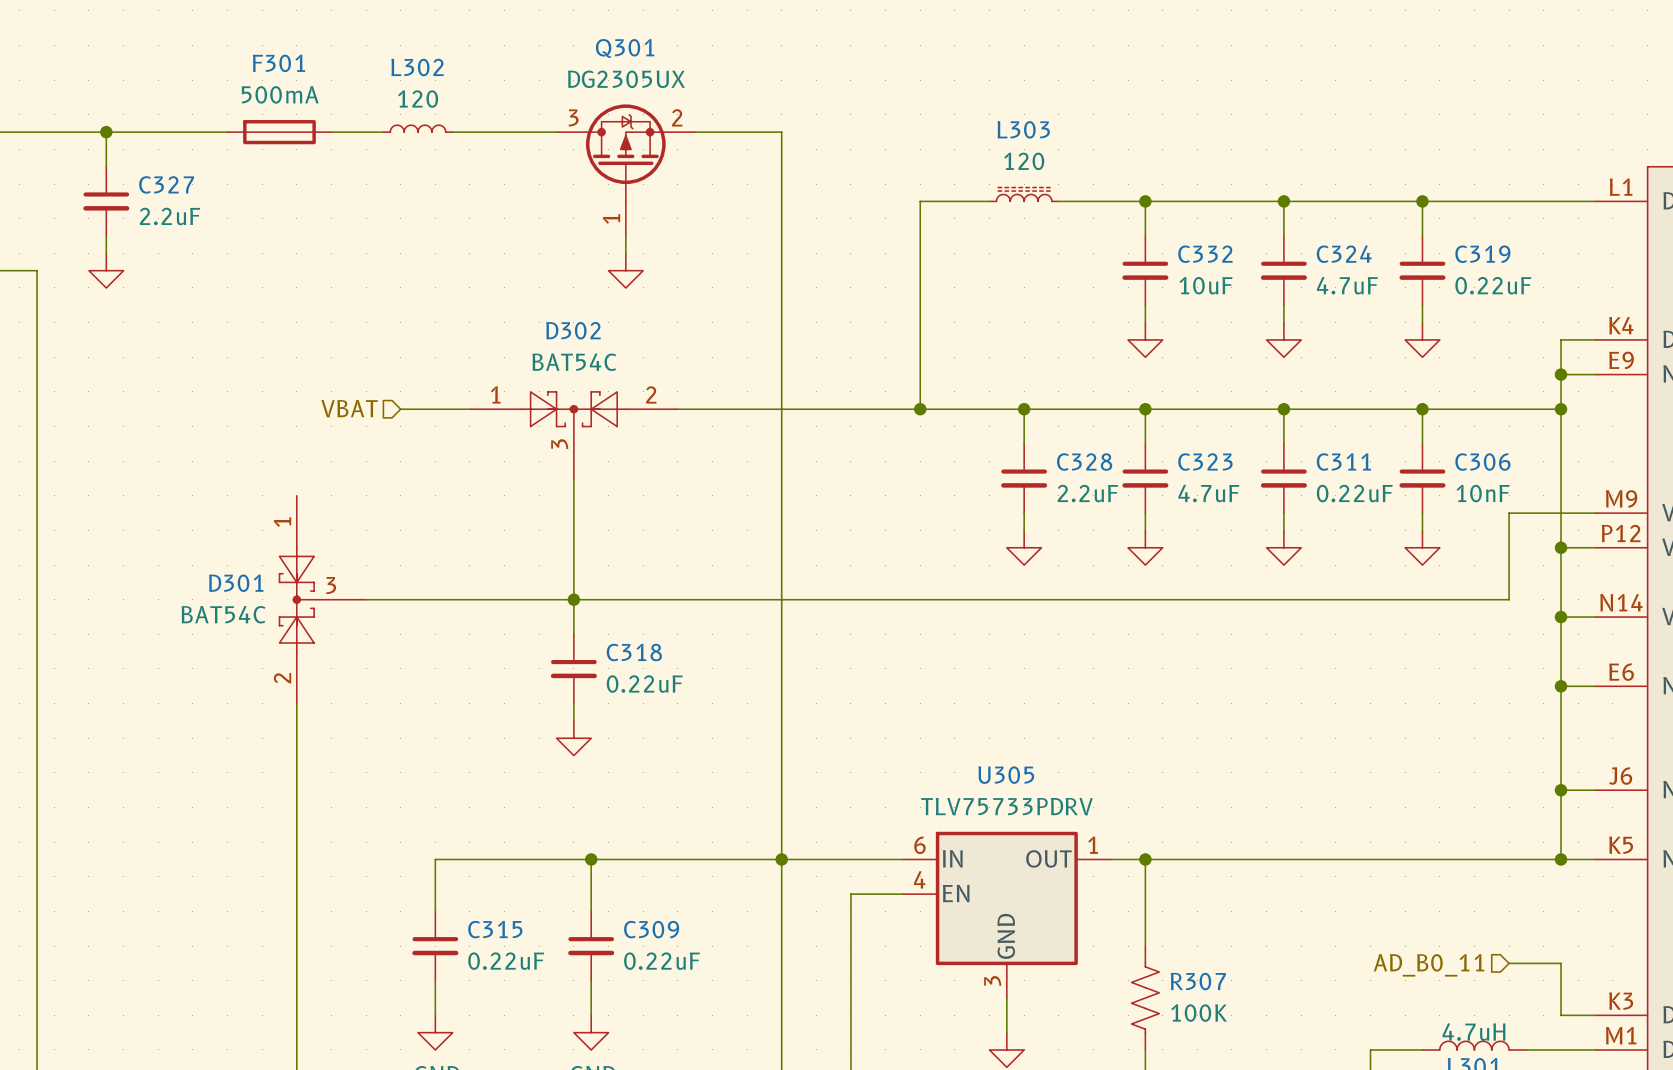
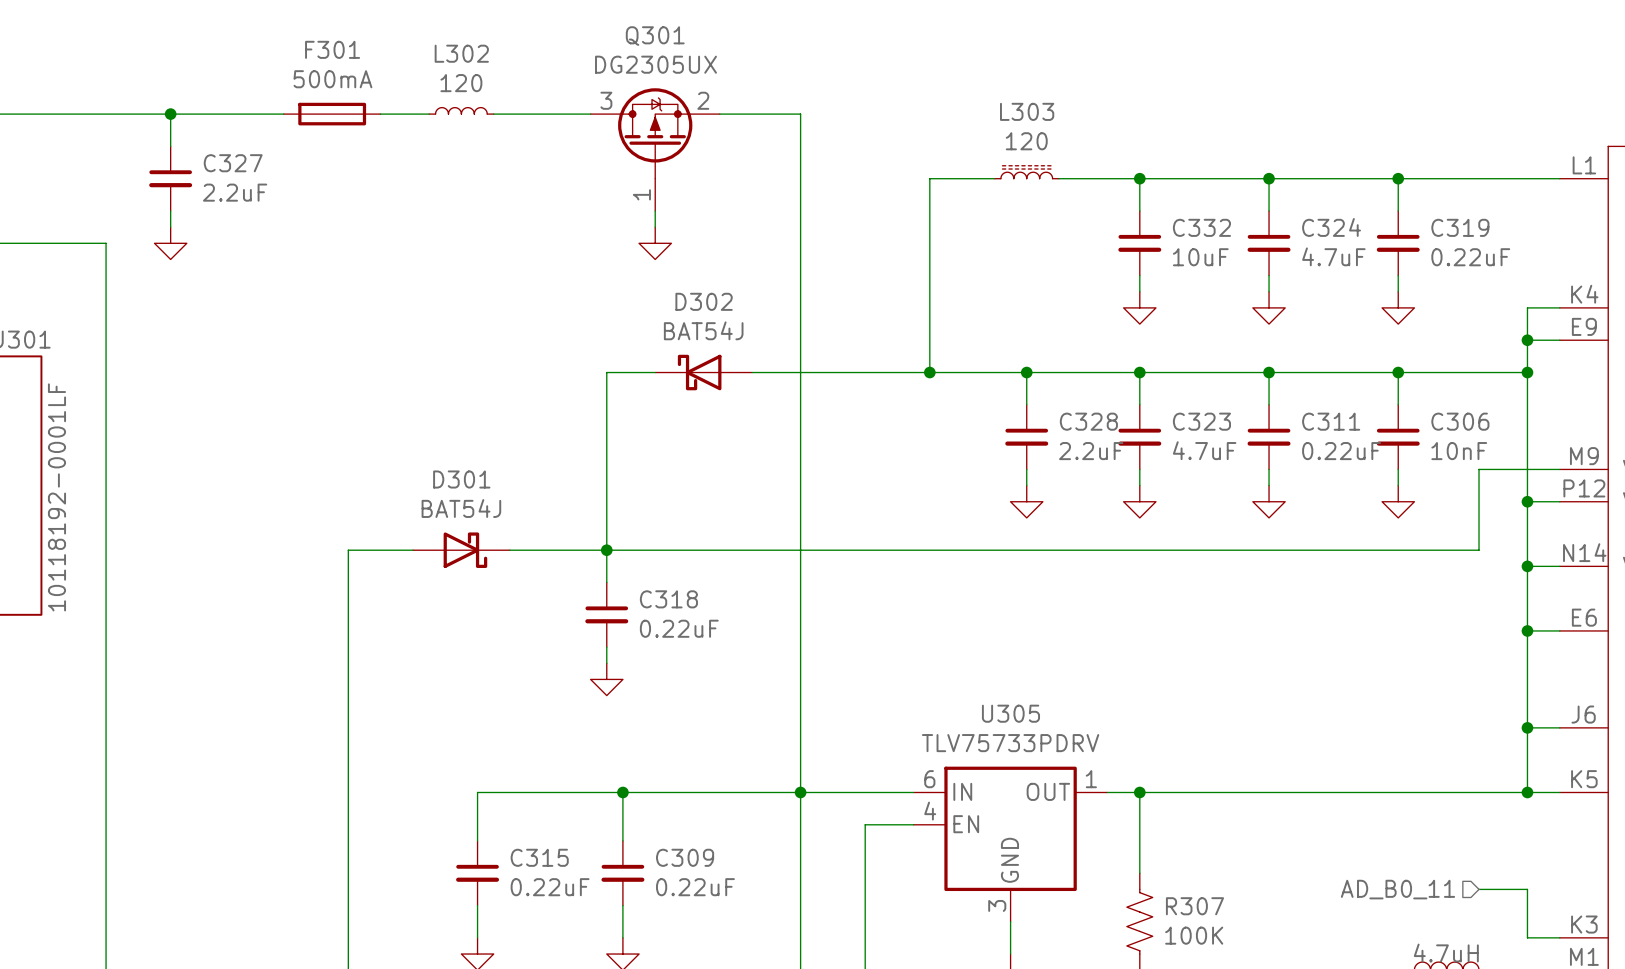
D302 name position: D302 (573, 330) -> D302 (704, 301)
D302 value: BAT54C (574, 362) -> BAT54J (703, 330)
D302 symbol: [469, 391, 678, 479] -> [655, 354, 753, 391]
hierarchical label: VBAT (349, 408) -> none
wire: (400, 409) (469, 409) -> none
D301 symbol: [279, 495, 367, 704] -> [412, 532, 510, 568]
D301 name position: D301 (236, 583) -> D301 (461, 479)
D301 value: BAT54C (223, 614) -> BAT54J (461, 508)

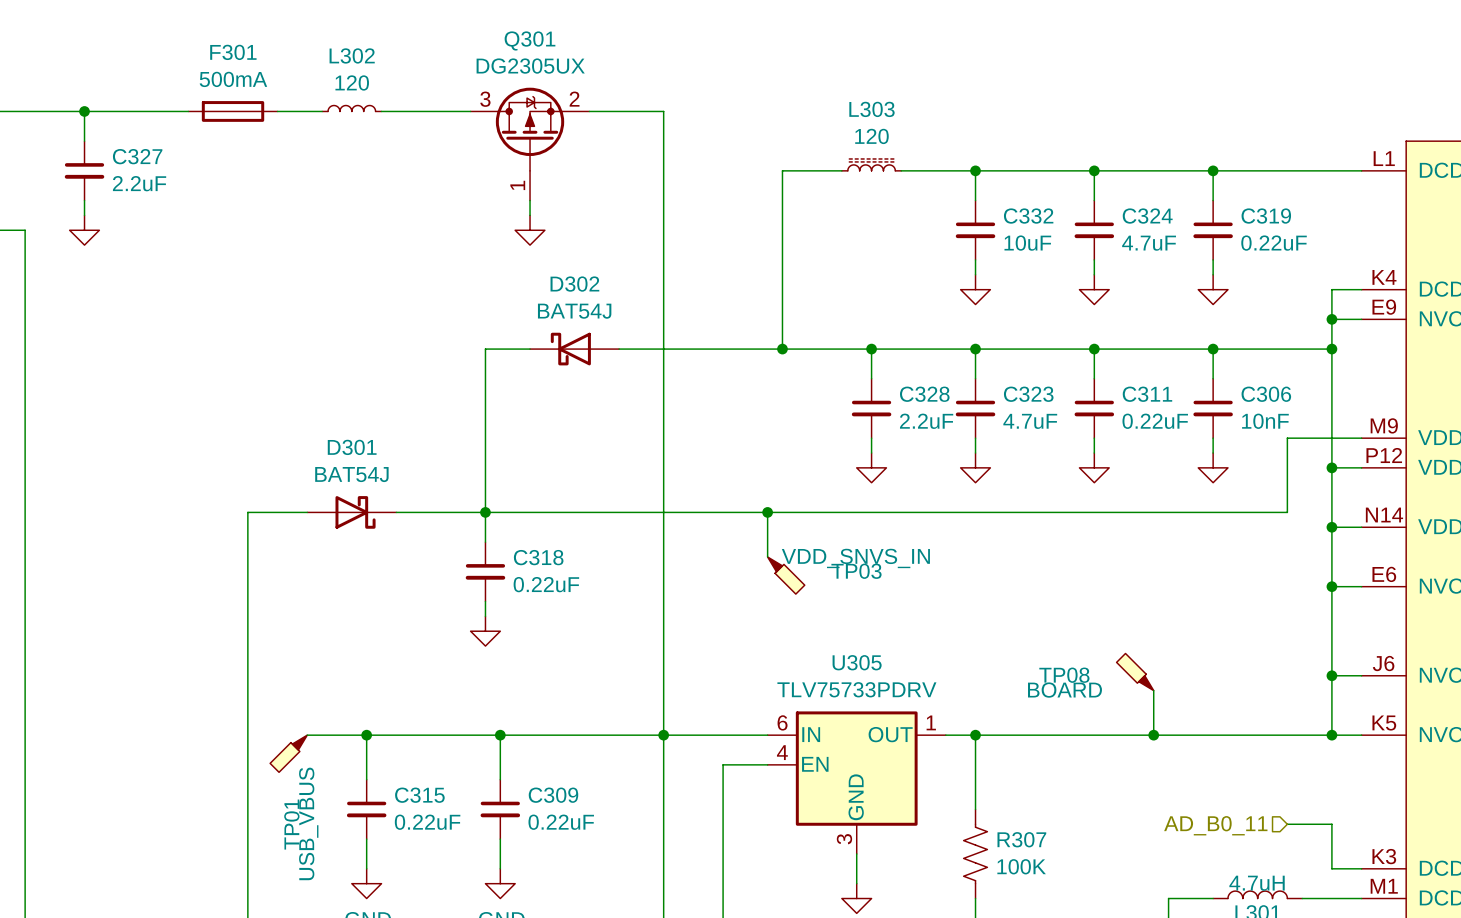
wire: none -> (767, 512) (767, 556)
junction: none -> (767, 512)
TP03: none -> VDD_SNVS_IN (786, 575)
TP08: none -> BOARD (1135, 672)
wire: none -> (1153, 690) (1153, 735)
wire: none -> (307, 735) (366, 735)
junction: none -> (366, 735)
junction: none -> (1153, 735)
TP01: none -> USB_VBUS (288, 753)

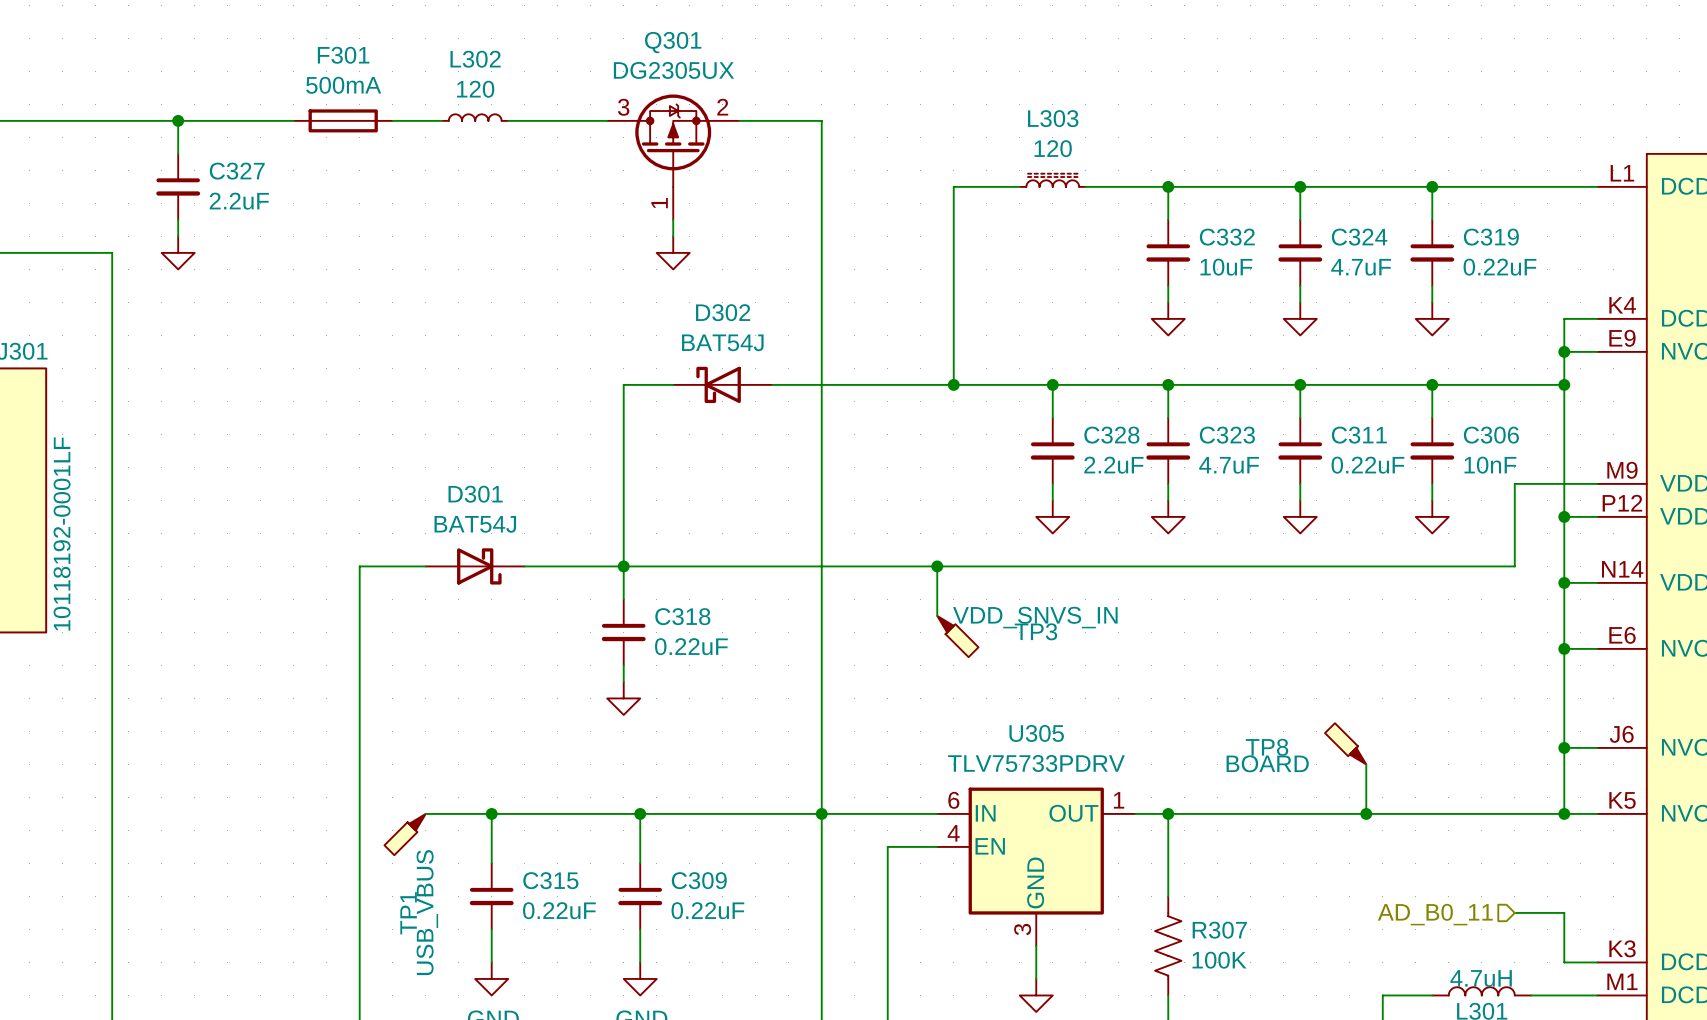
TP03 name: TP03 (856, 571) -> TP3 (1036, 631)
TP08 name: TP08 (1064, 675) -> TP8 (1267, 747)
TP01 name: TP01 (291, 824) -> TP1 (408, 913)

